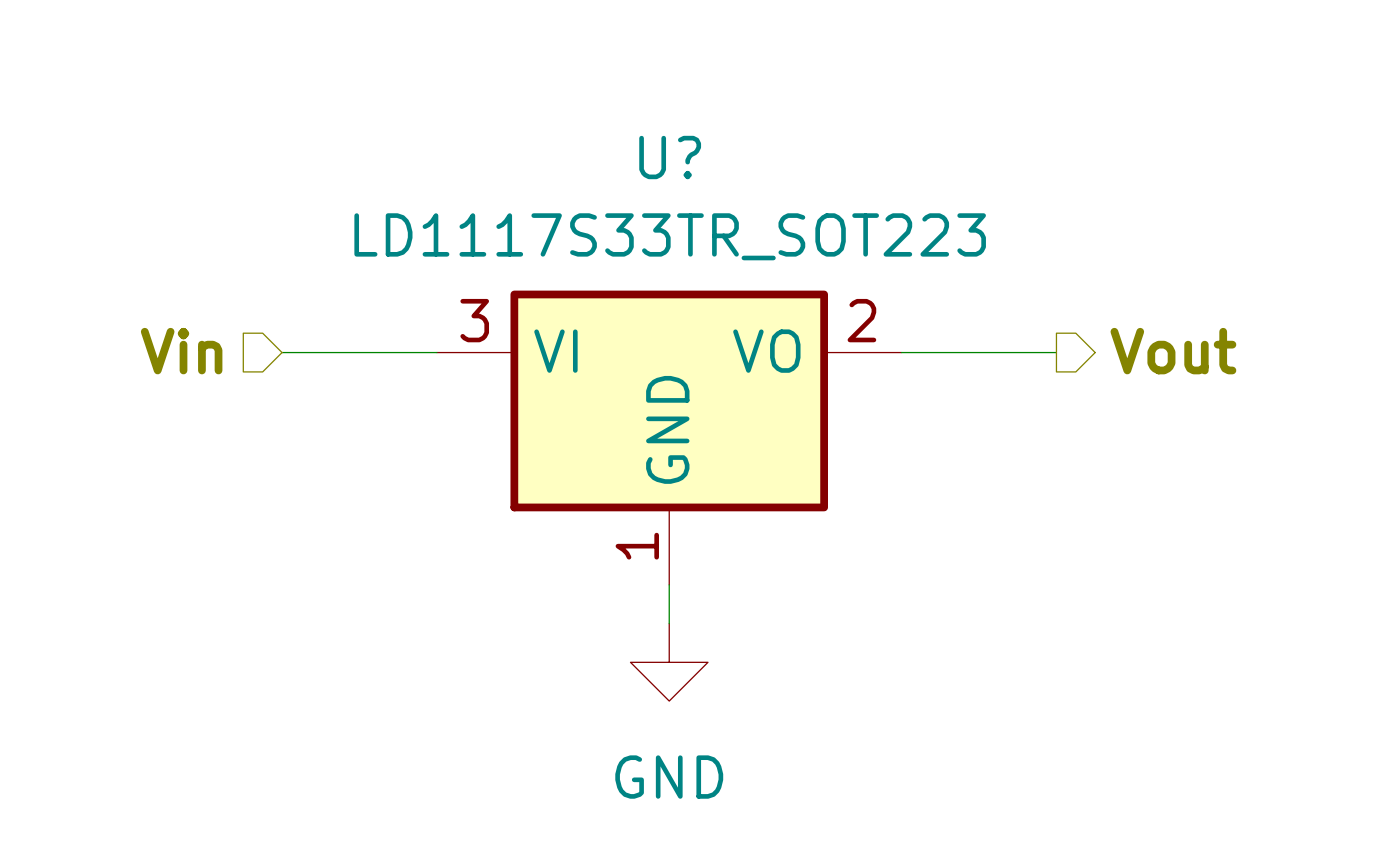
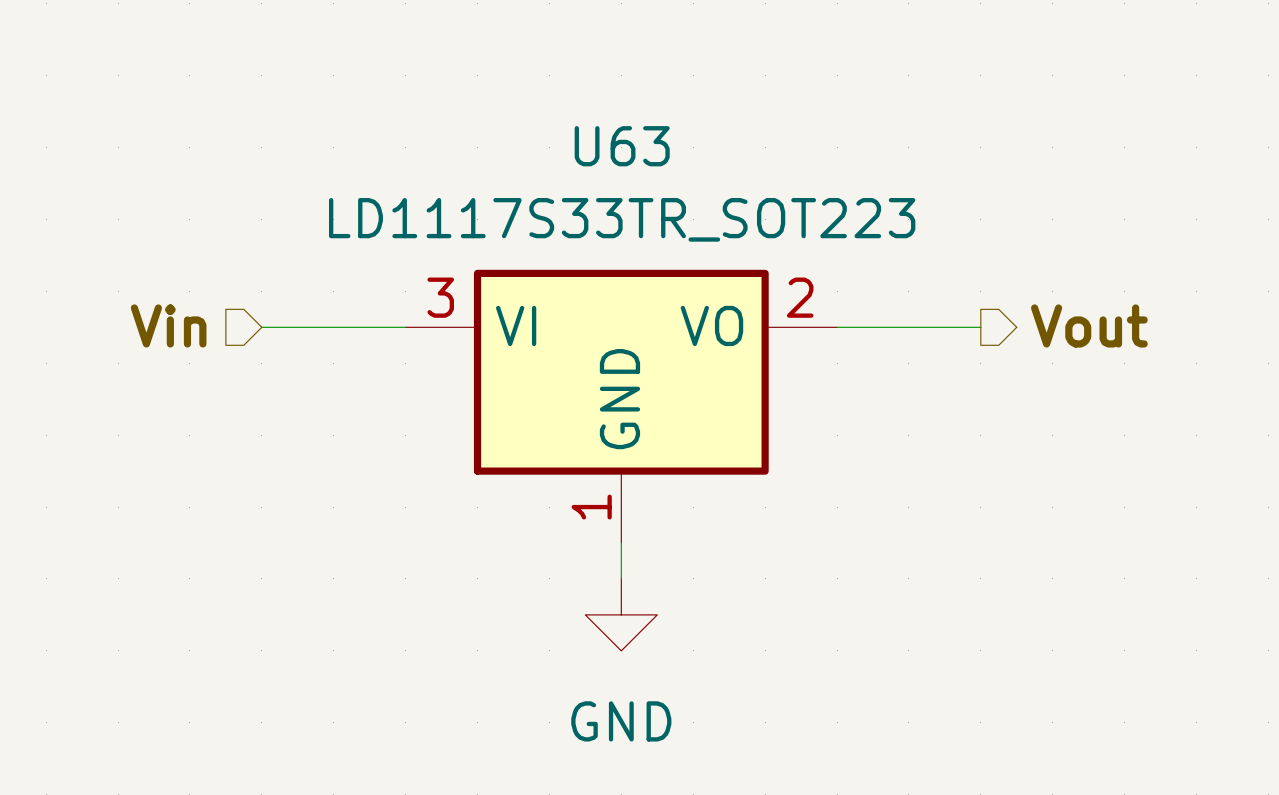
U? name: U? (670, 157) -> U63 (622, 146)

